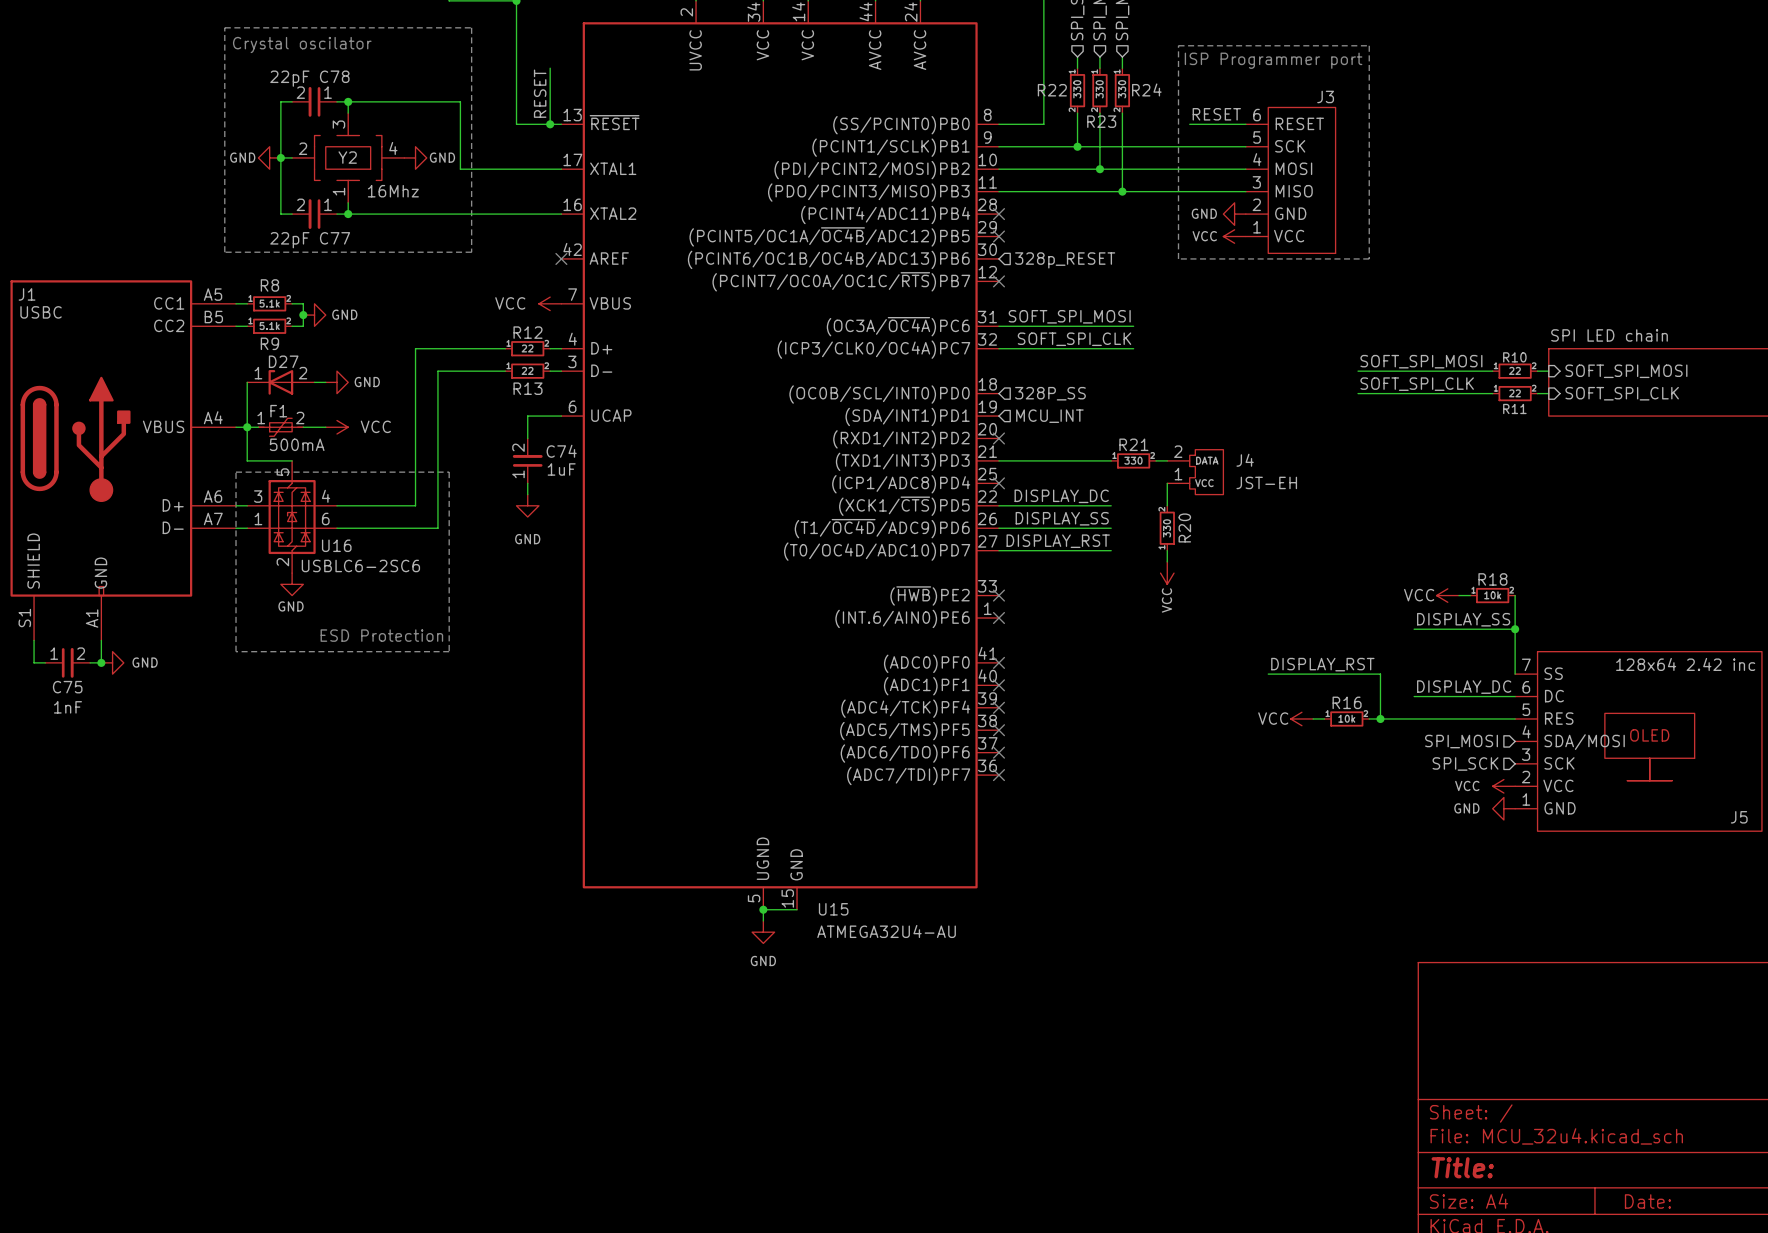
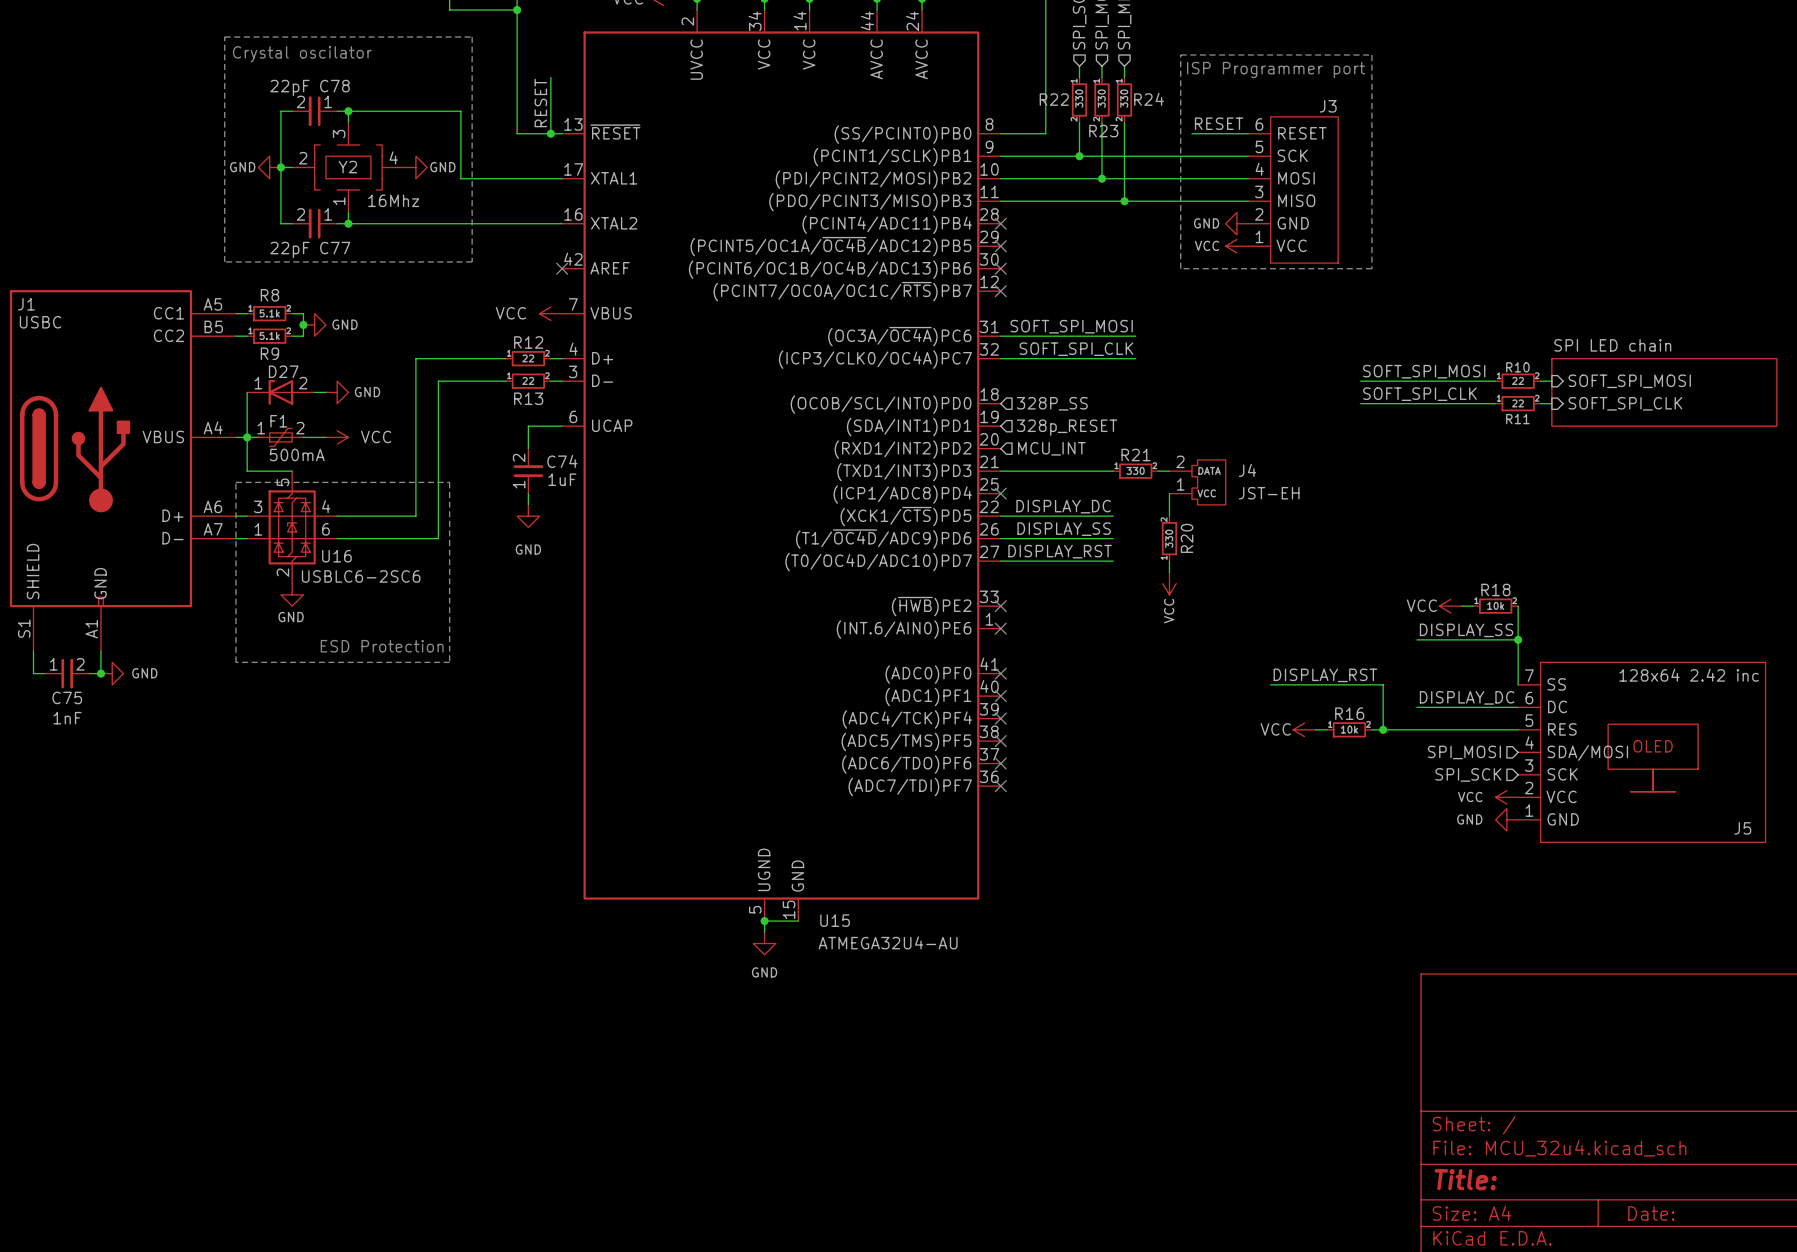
no-connect mark: none -> (1000, 268)
hierarchical label: 328p_RESET (1065, 260) -> none
hierarchical label: MCU_INT (1049, 416) -> 328p_RESET (1067, 427)
no-connect mark: (998, 438) -> none
hierarchical label: none -> MCU_INT (1051, 448)

